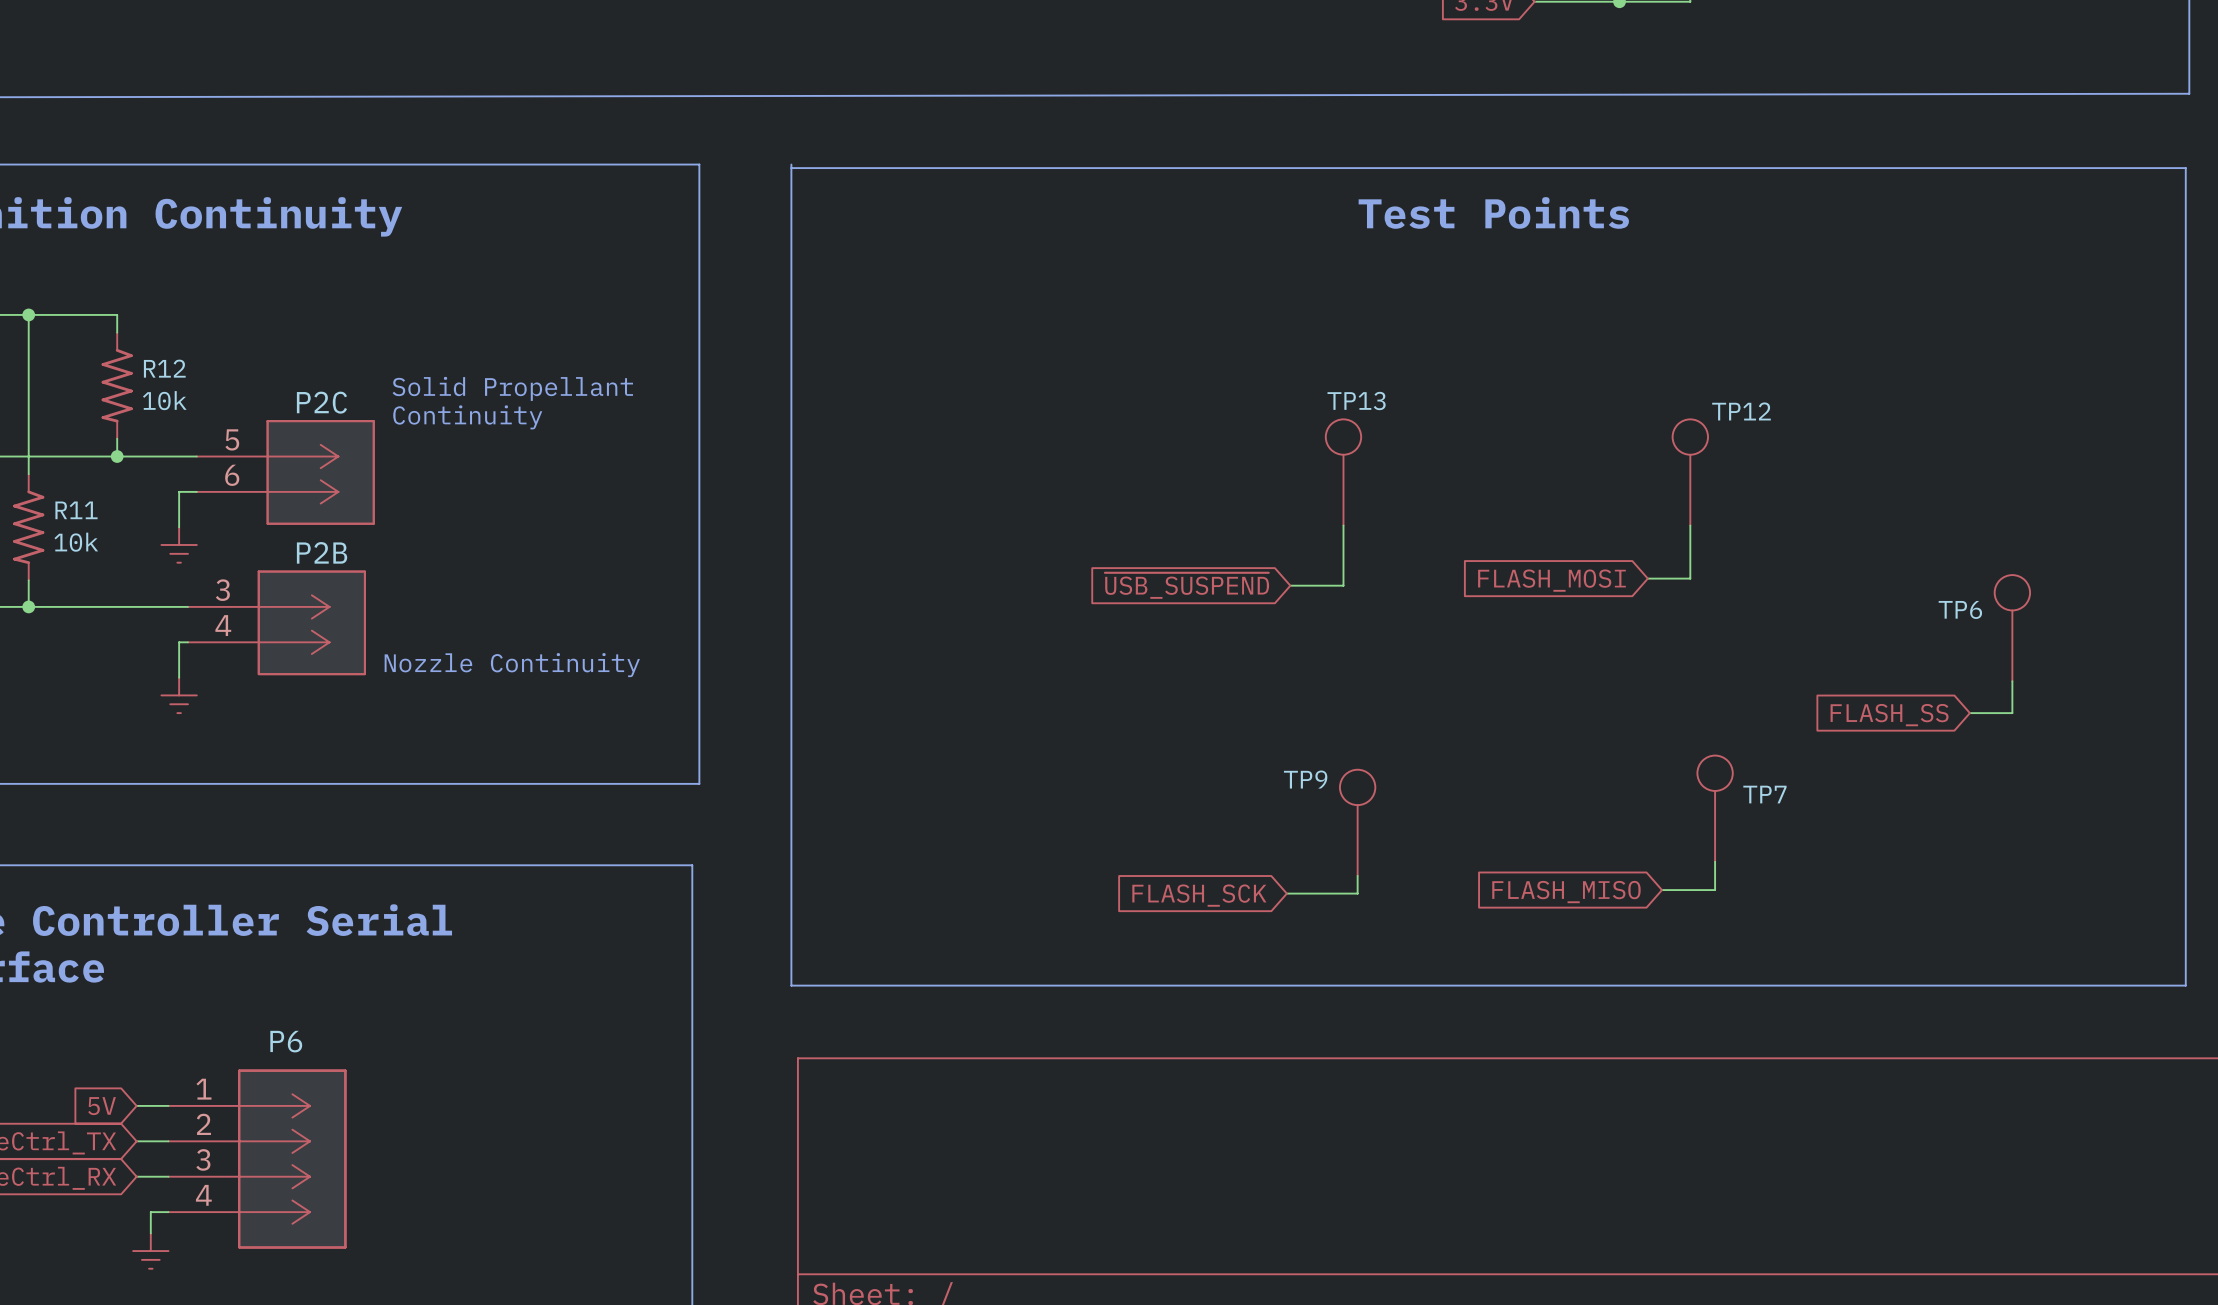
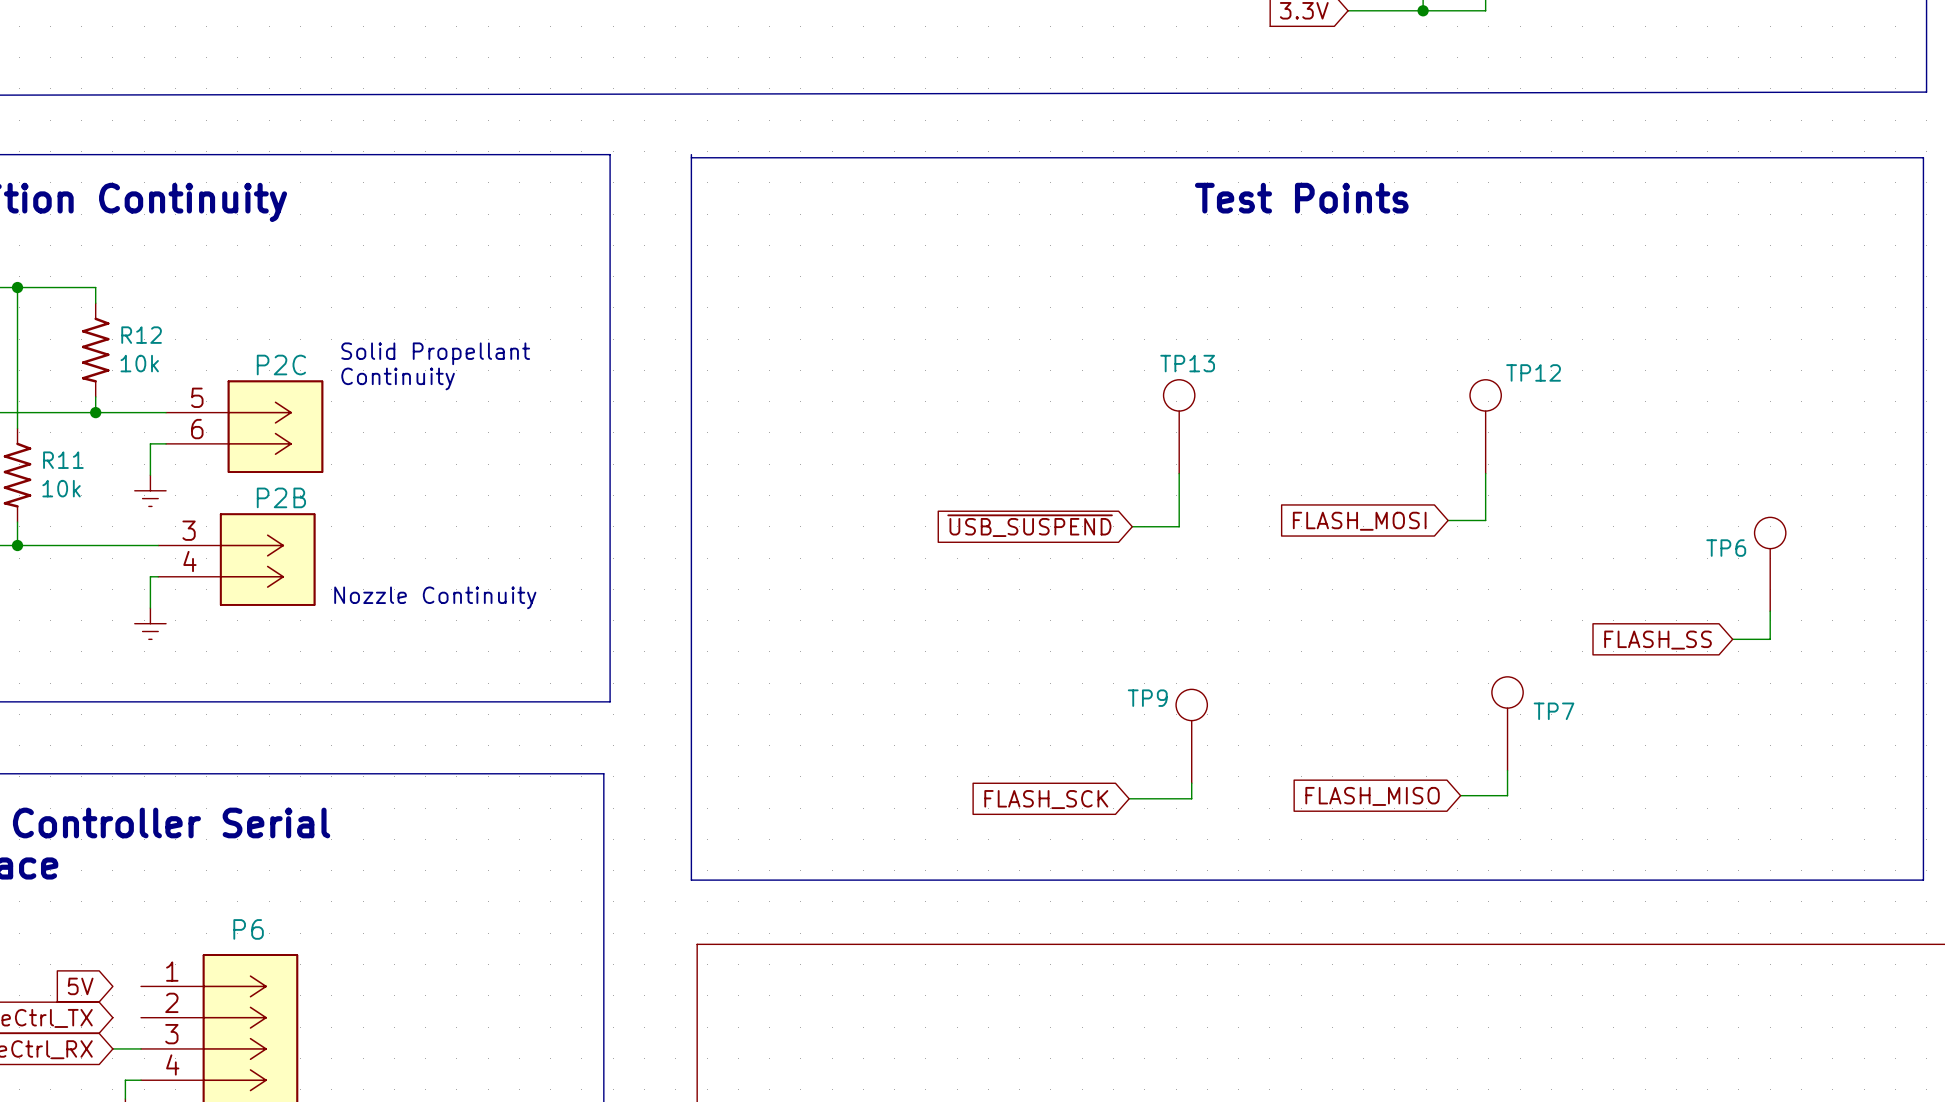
wire: (136, 1105) (168, 1105) -> none
wire: (136, 1141) (168, 1141) -> none

